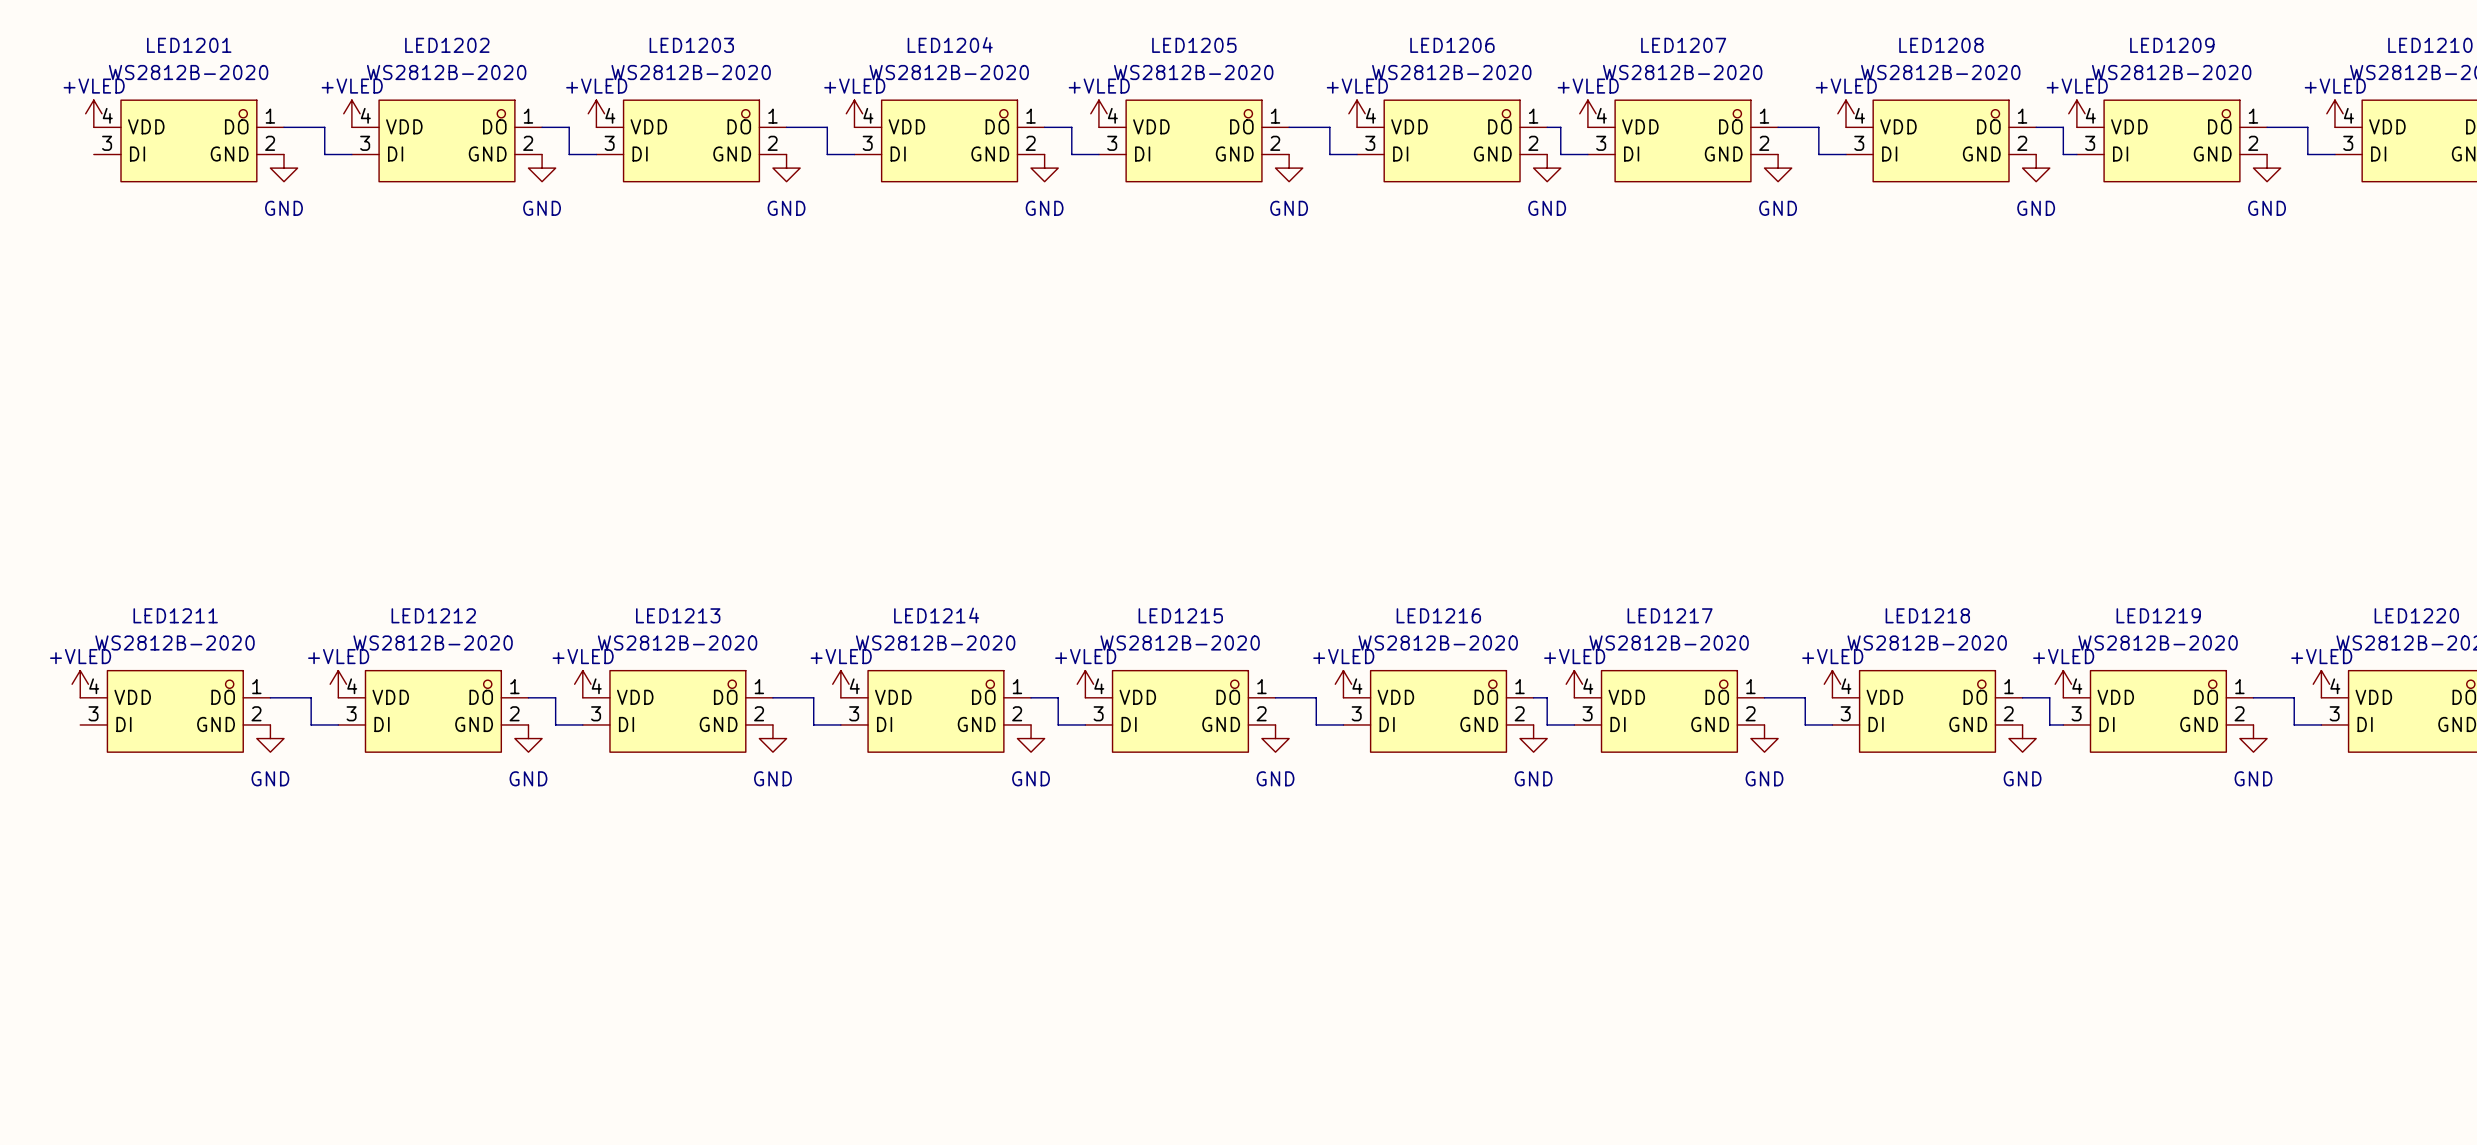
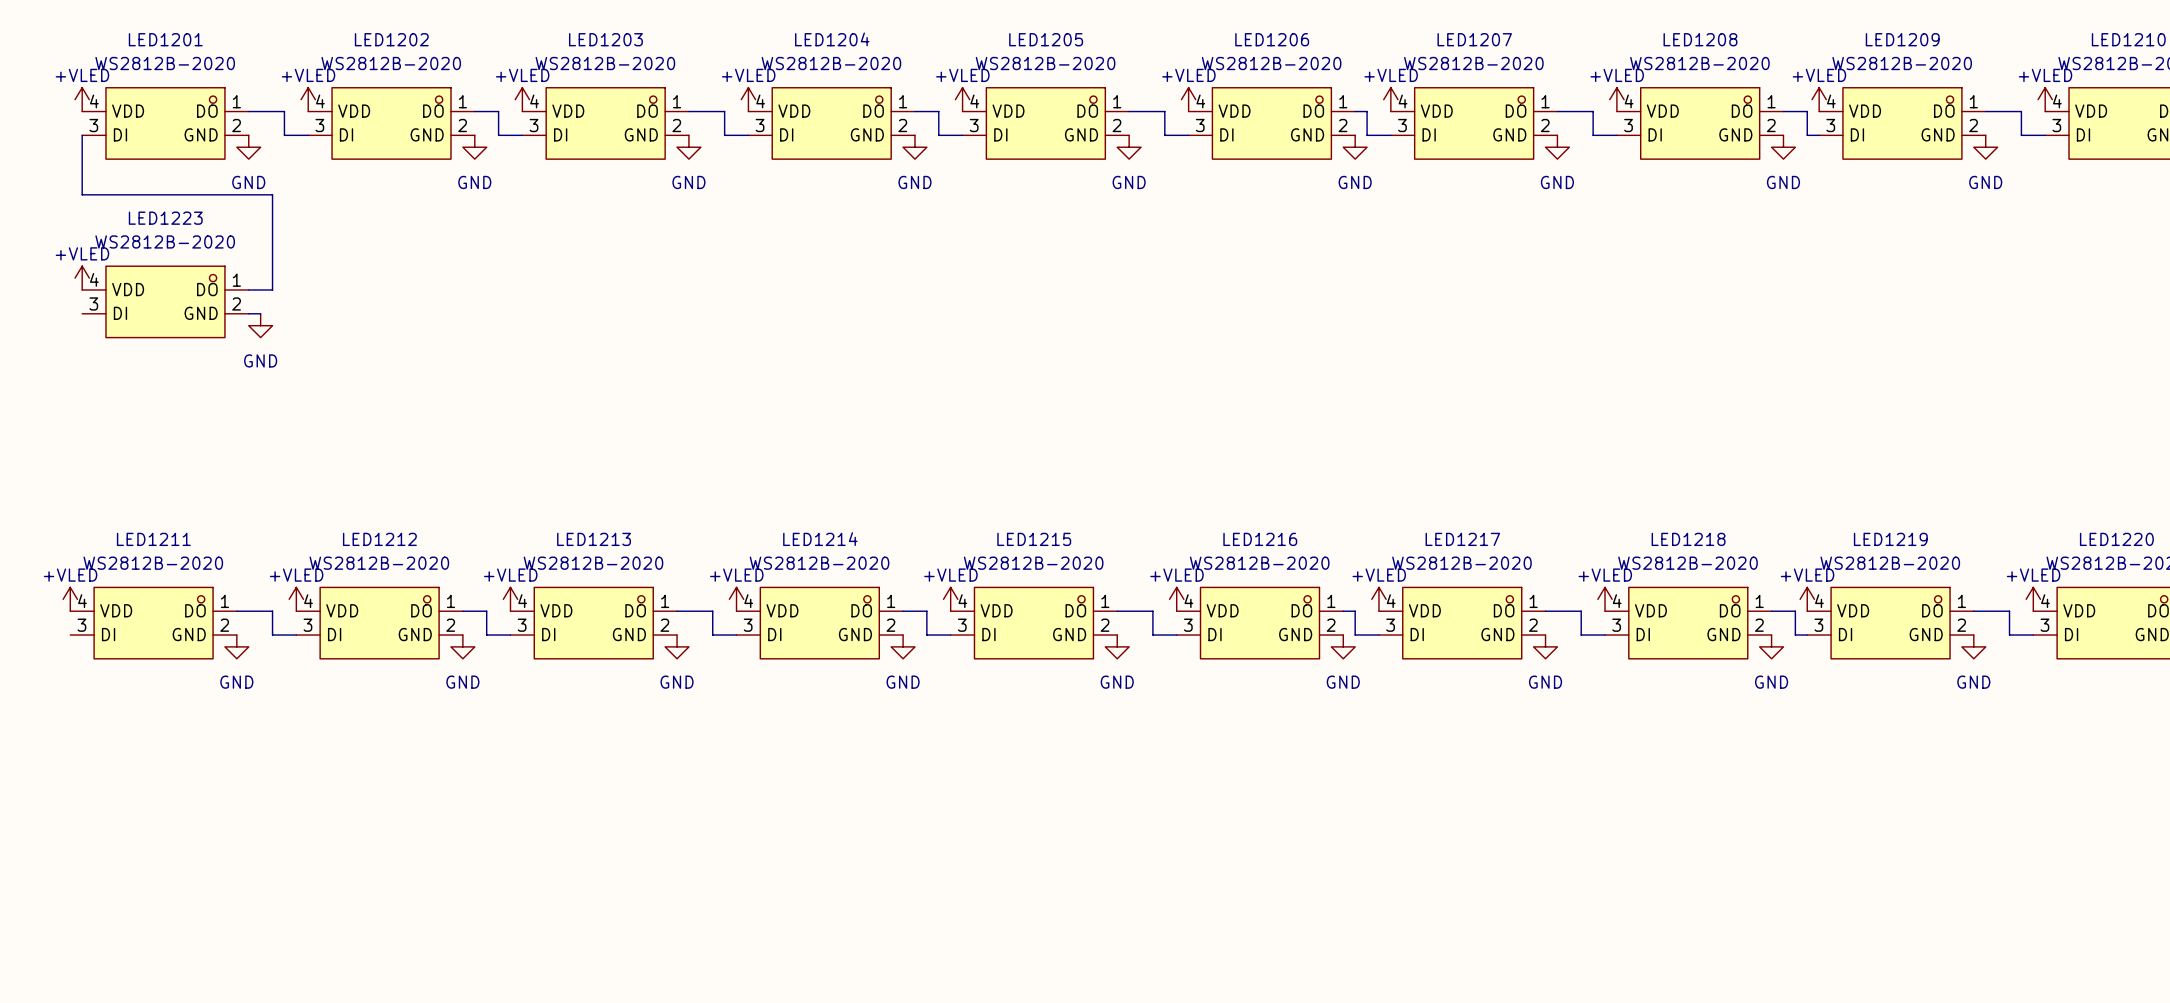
wire: none -> (82, 135) (82, 194) (272, 194) (272, 290) (248, 290)
power symbol: none -> +VLED (82, 278)
LED1223: none -> WS2812B-2020 (165, 301)
wire: none -> (248, 313) (260, 313)
power symbol: none -> GND (260, 325)

